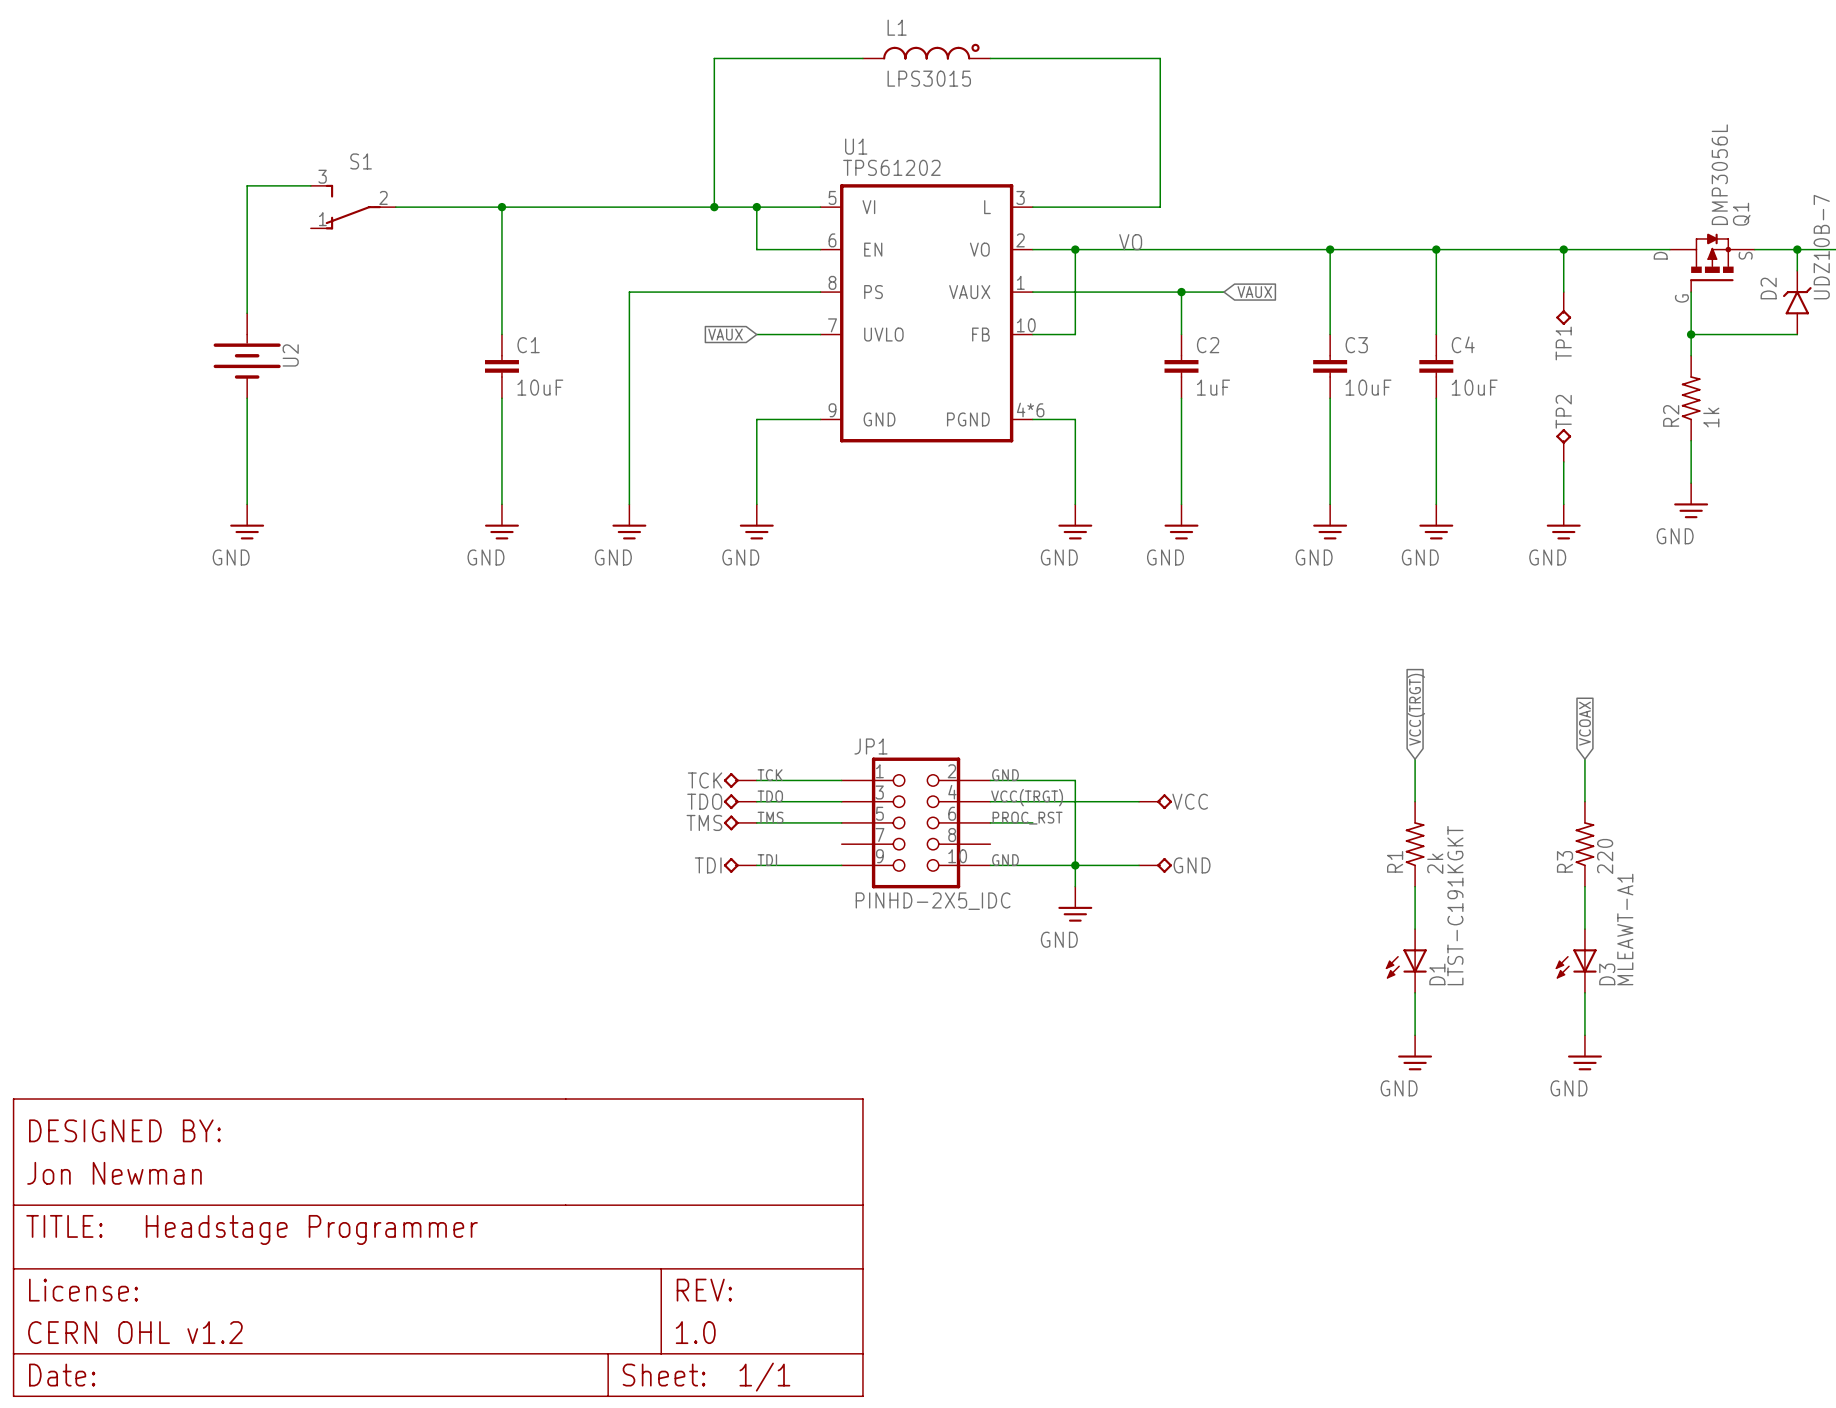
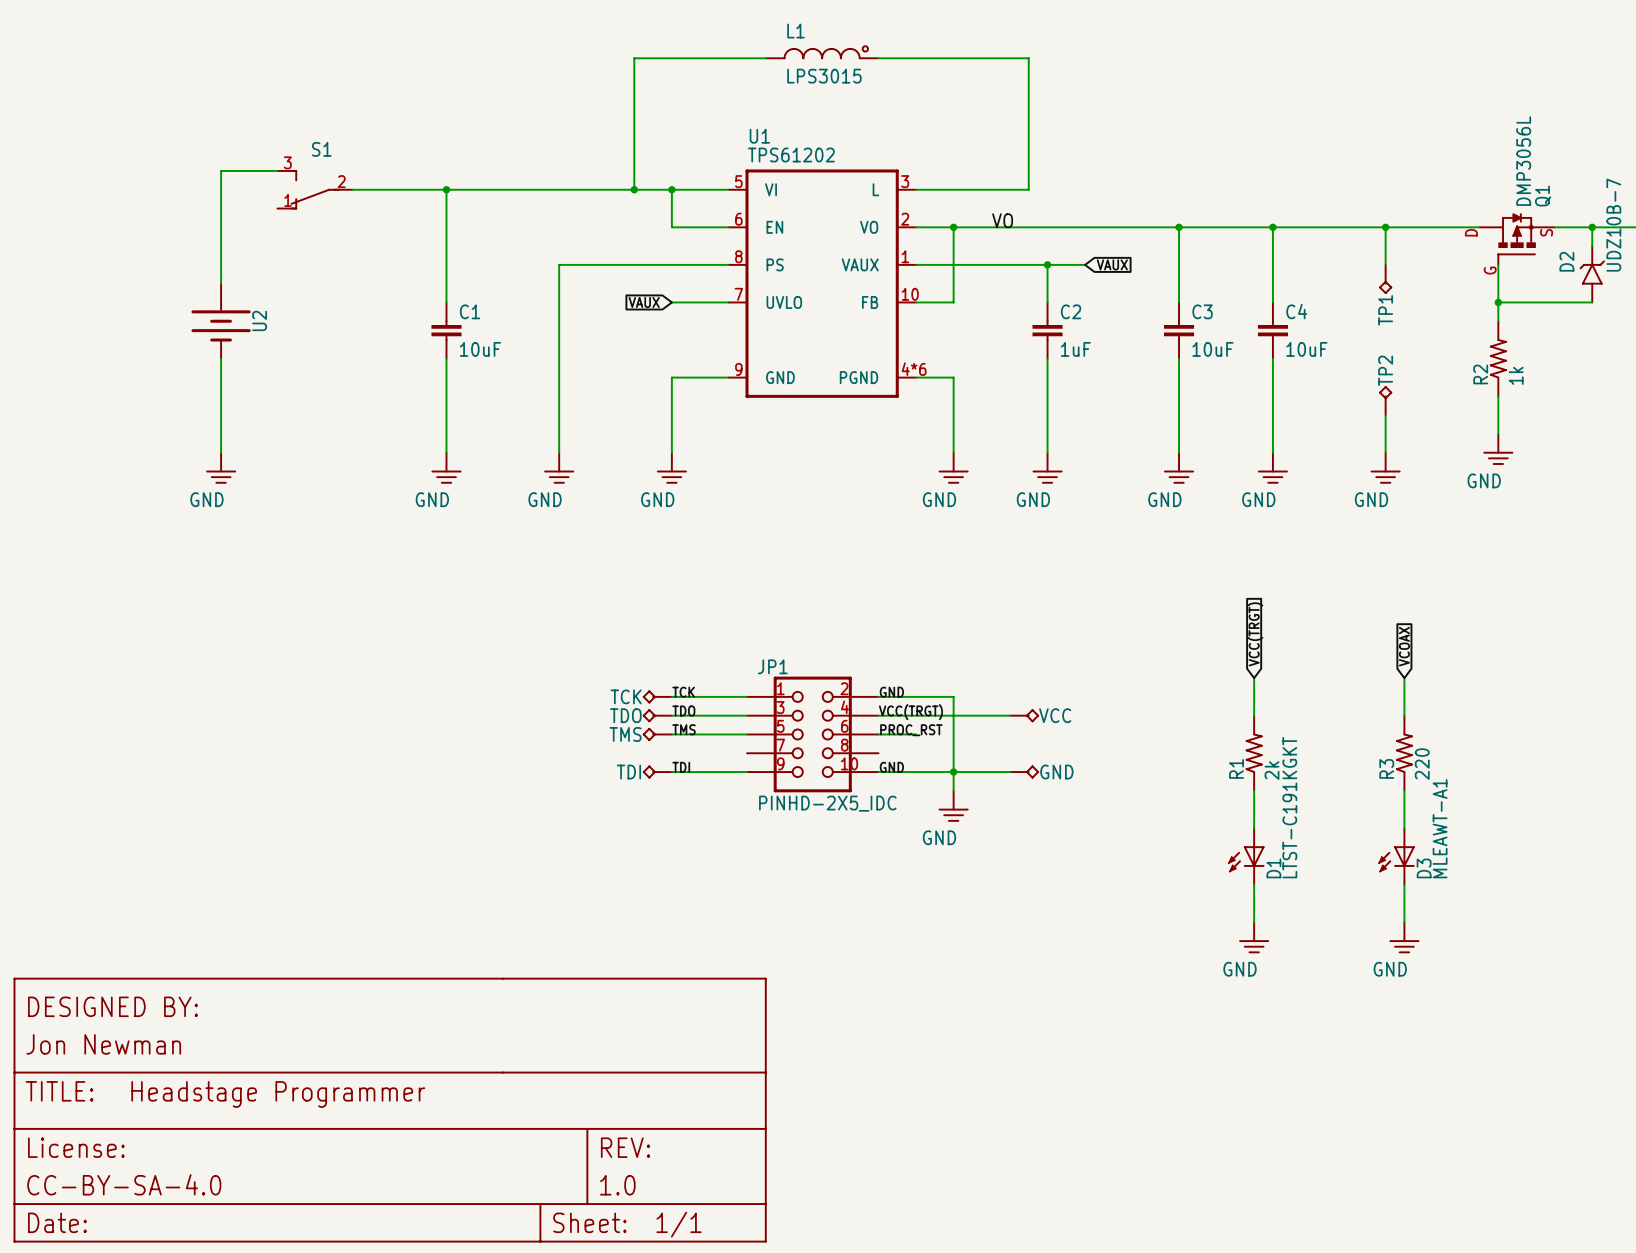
part text: CERN OHL v1.2 (135, 1332) -> CC-BY-SA-4.0 (124, 1184)

